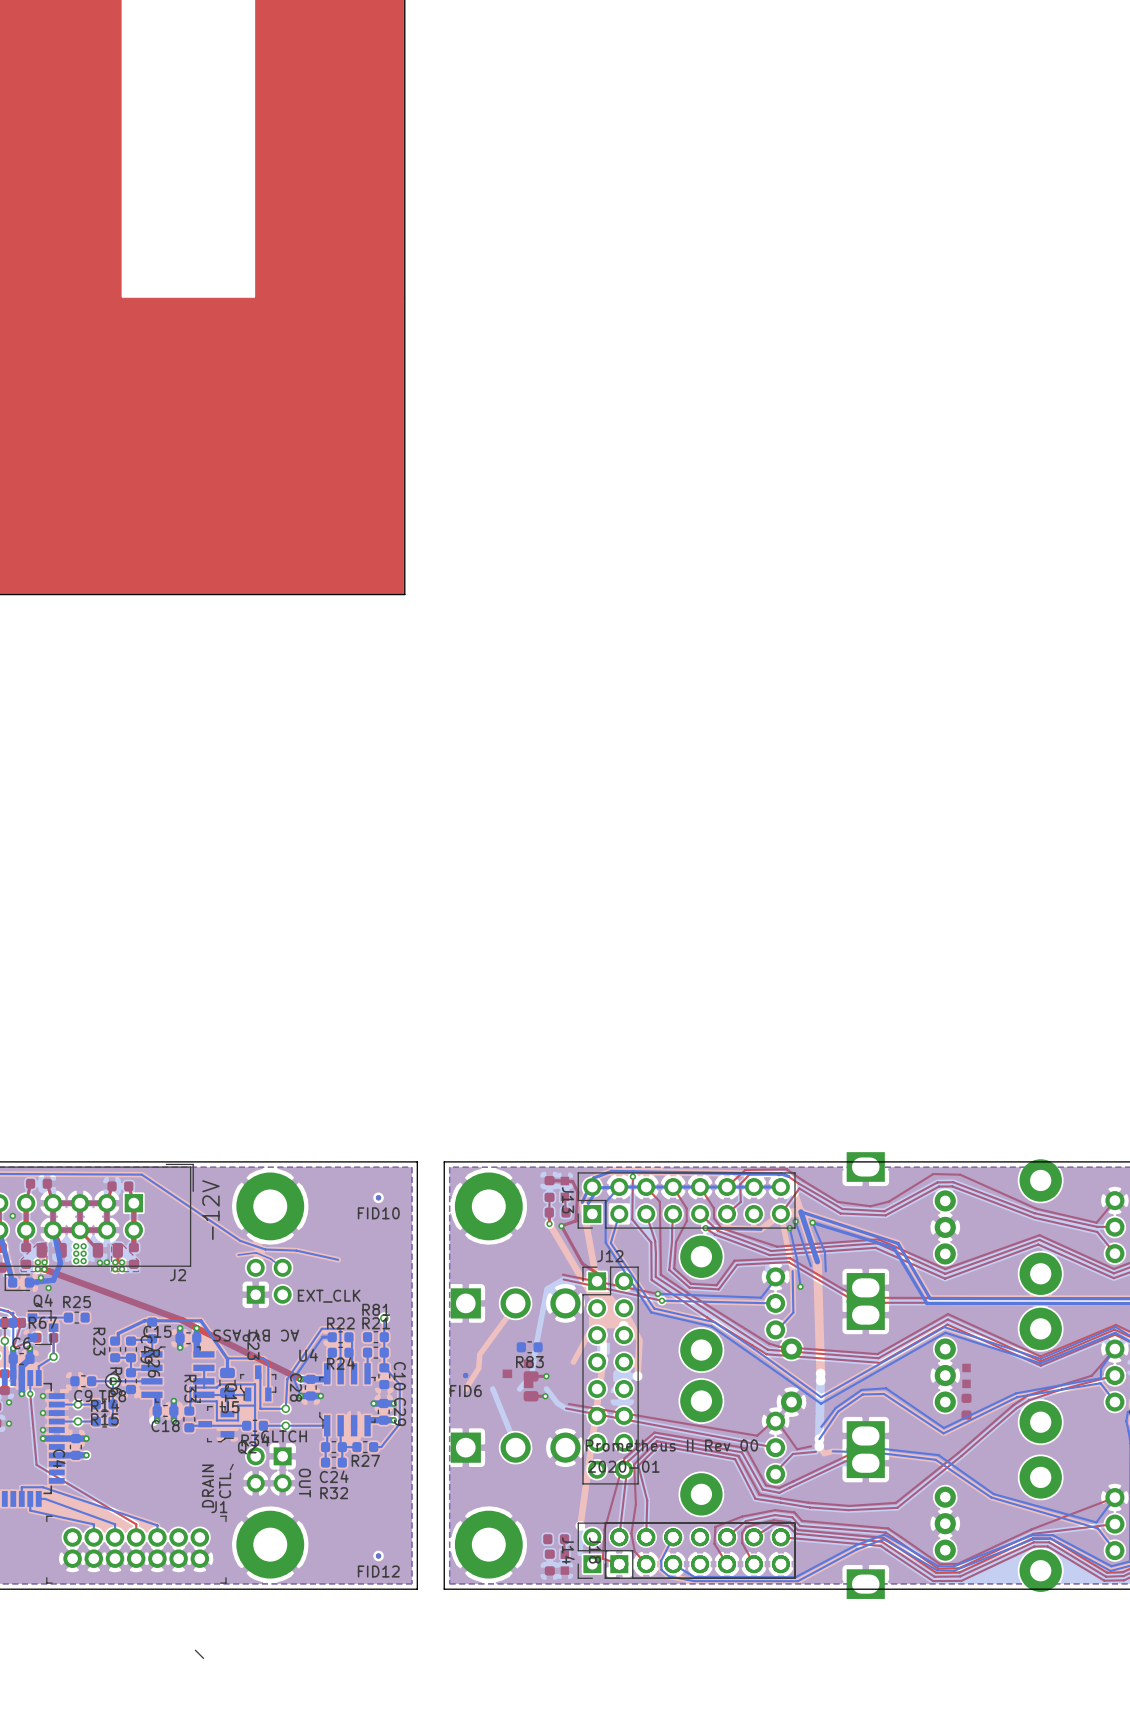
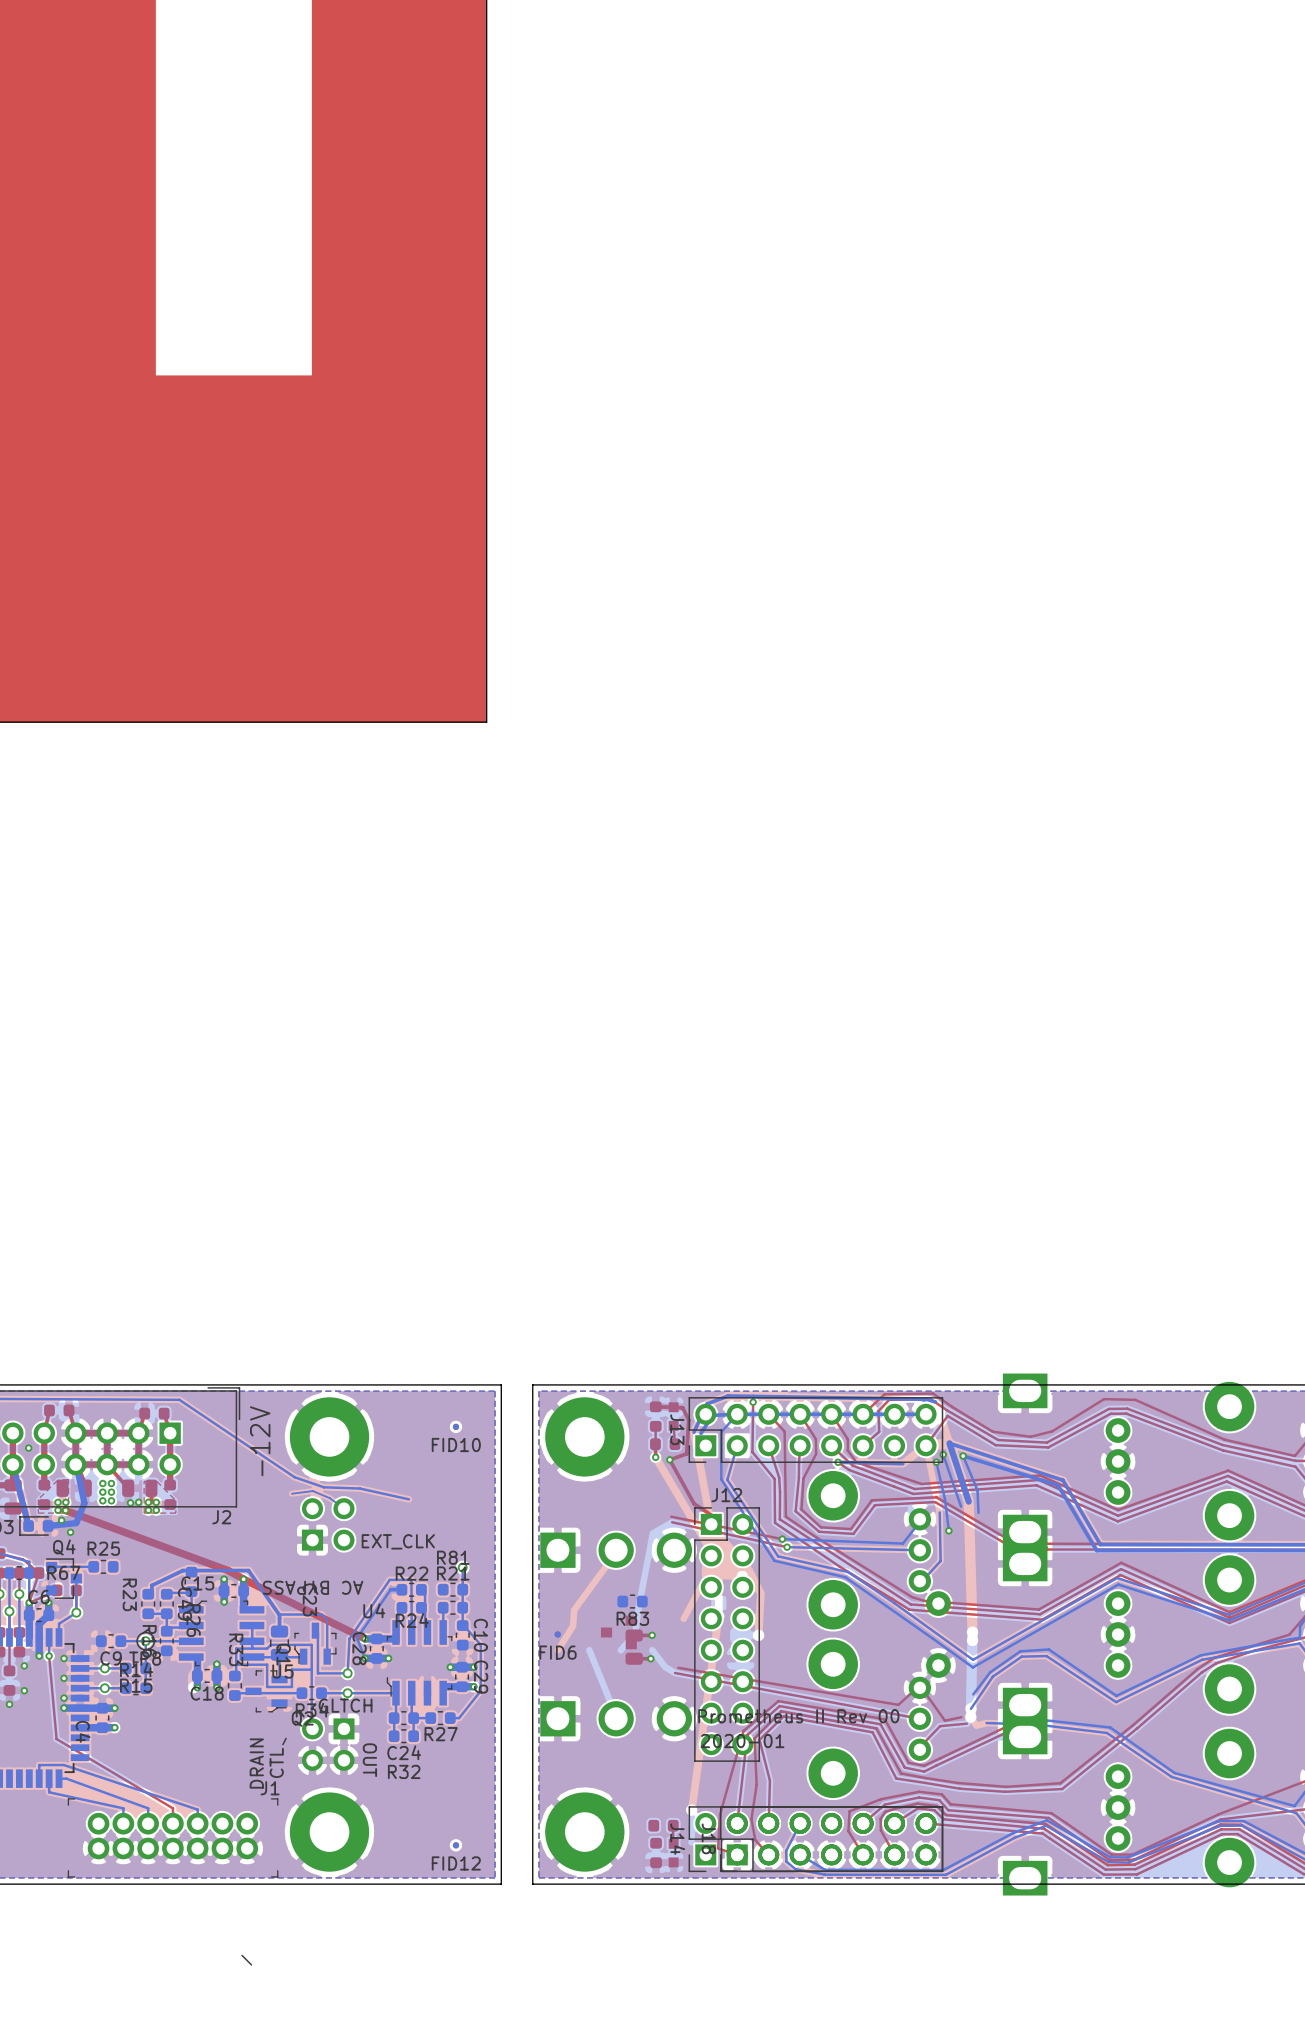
part: (966, 1375) -> none
part: (966, 1406) -> none

